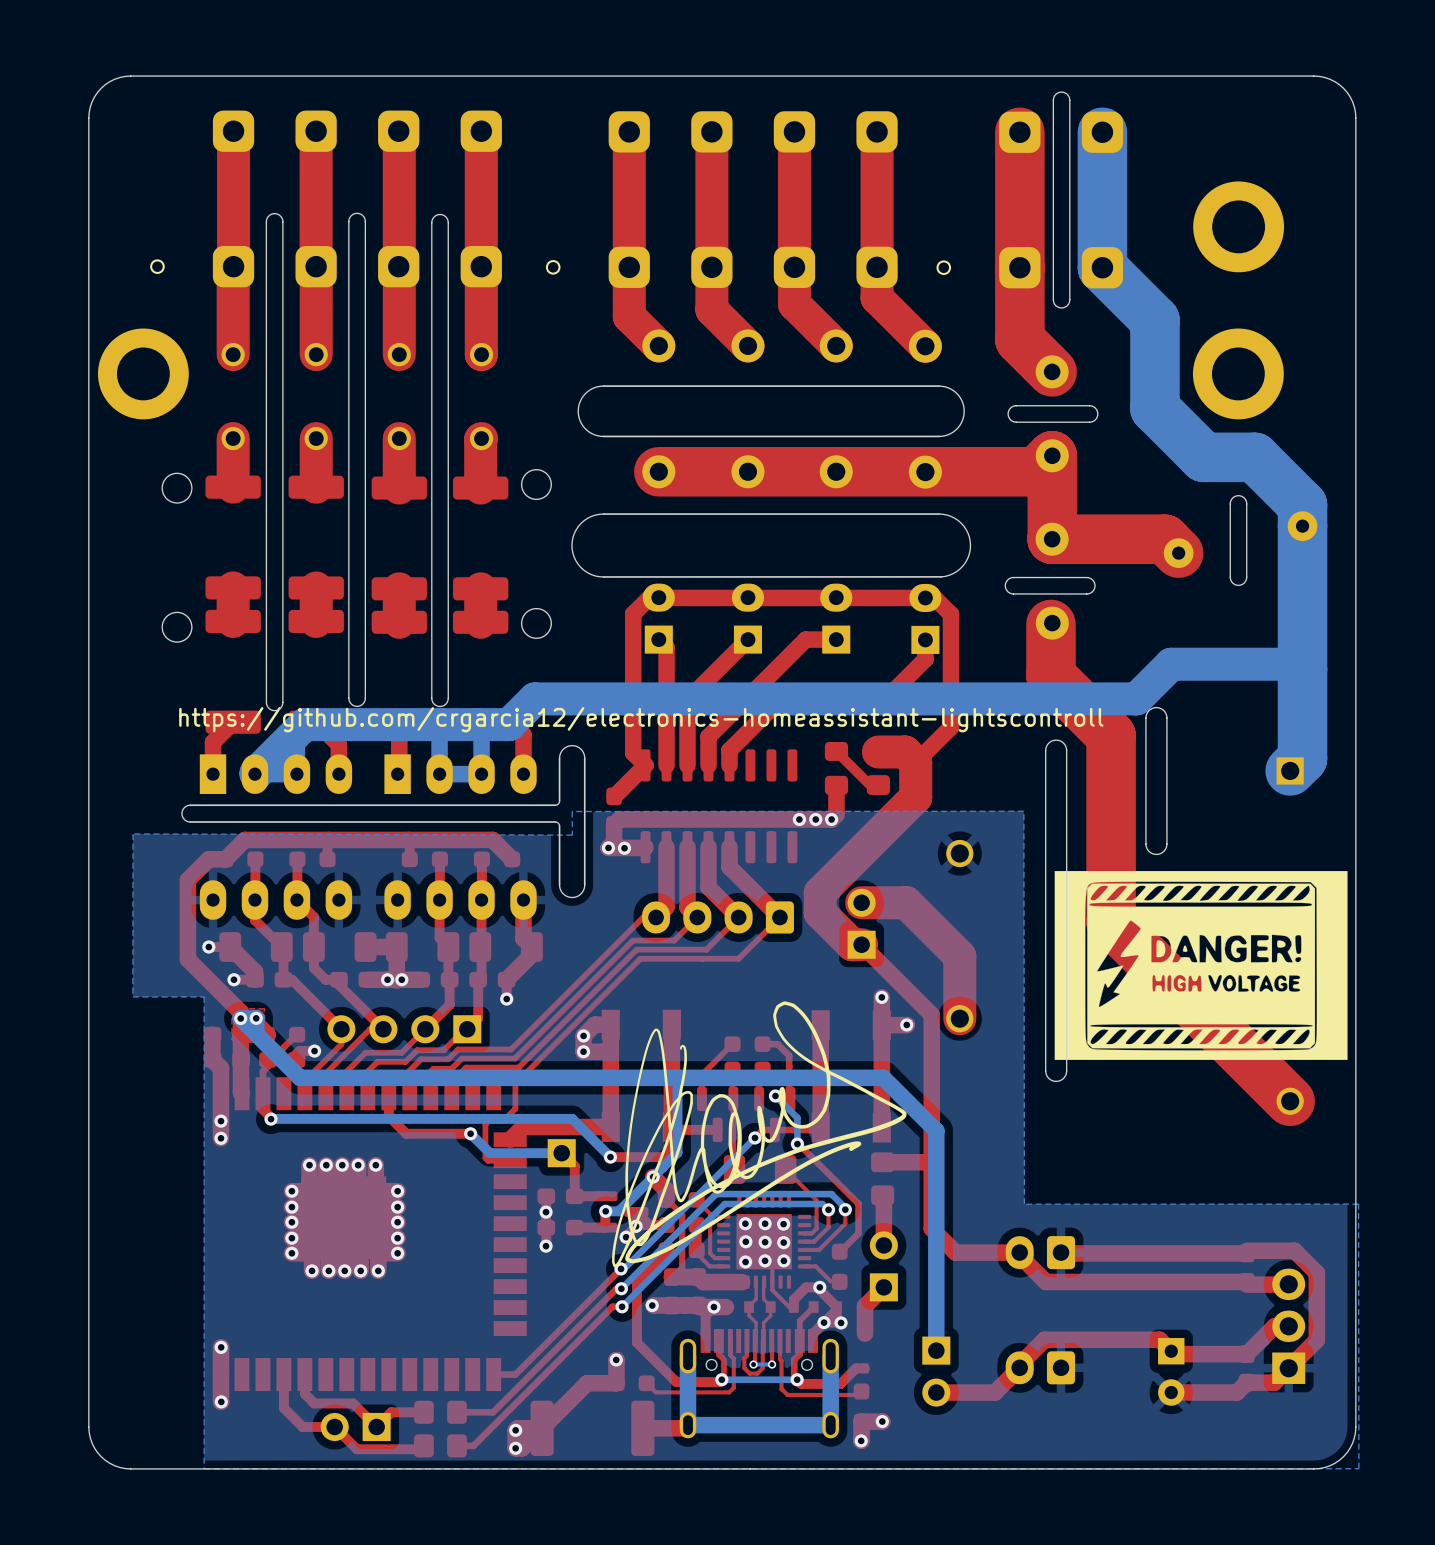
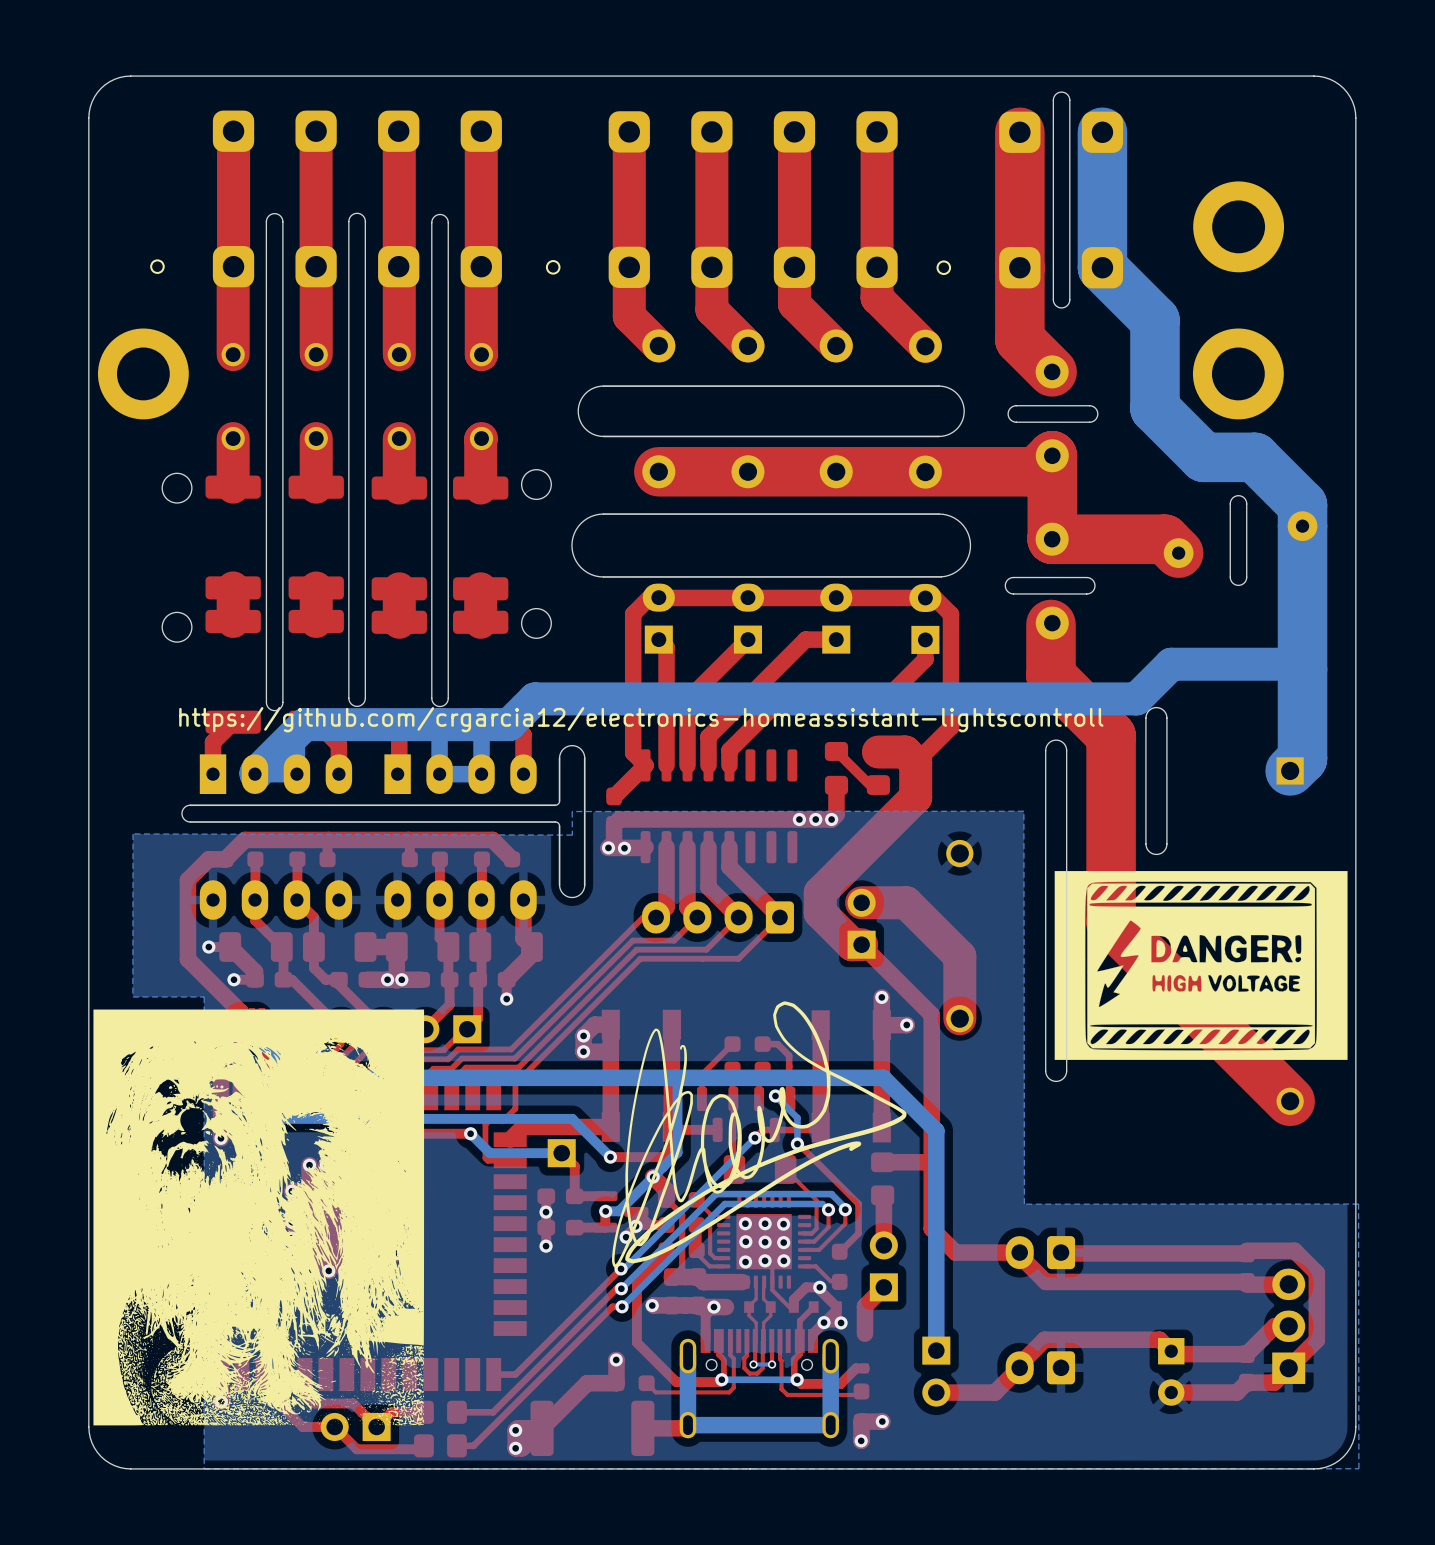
part: none -> (258, 1217)

